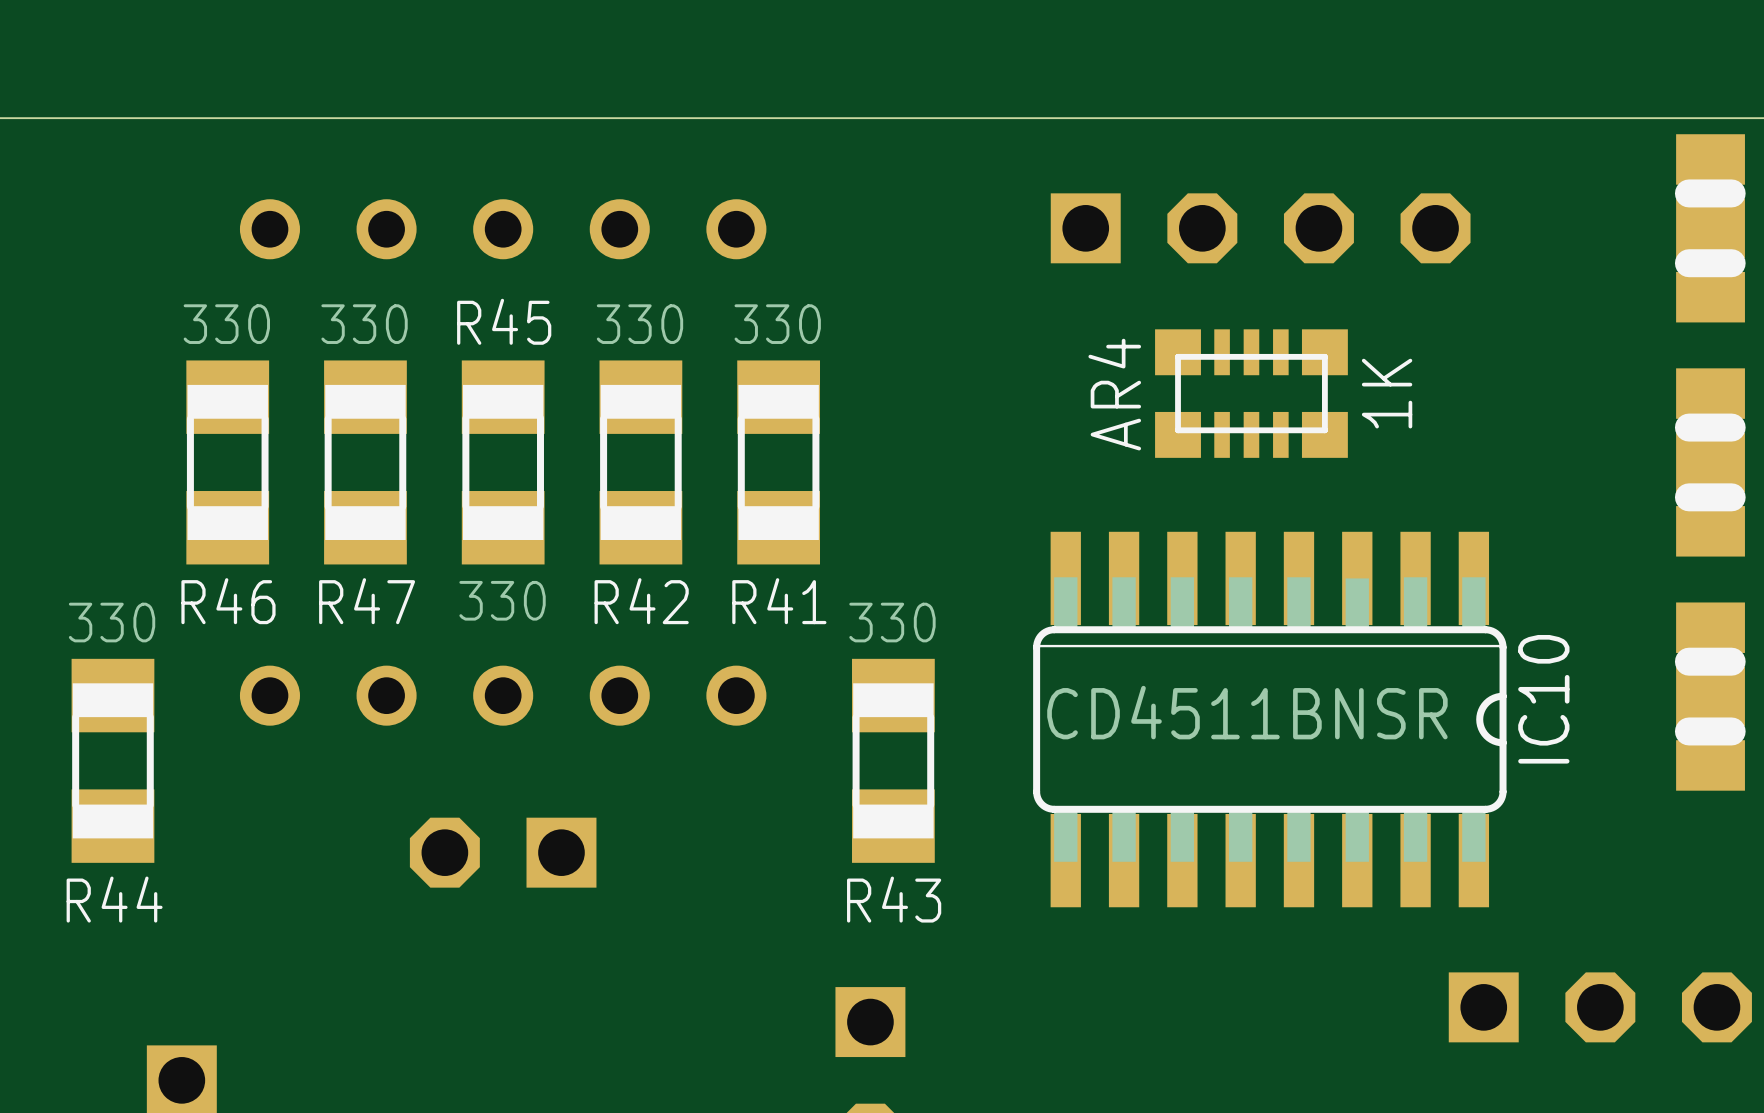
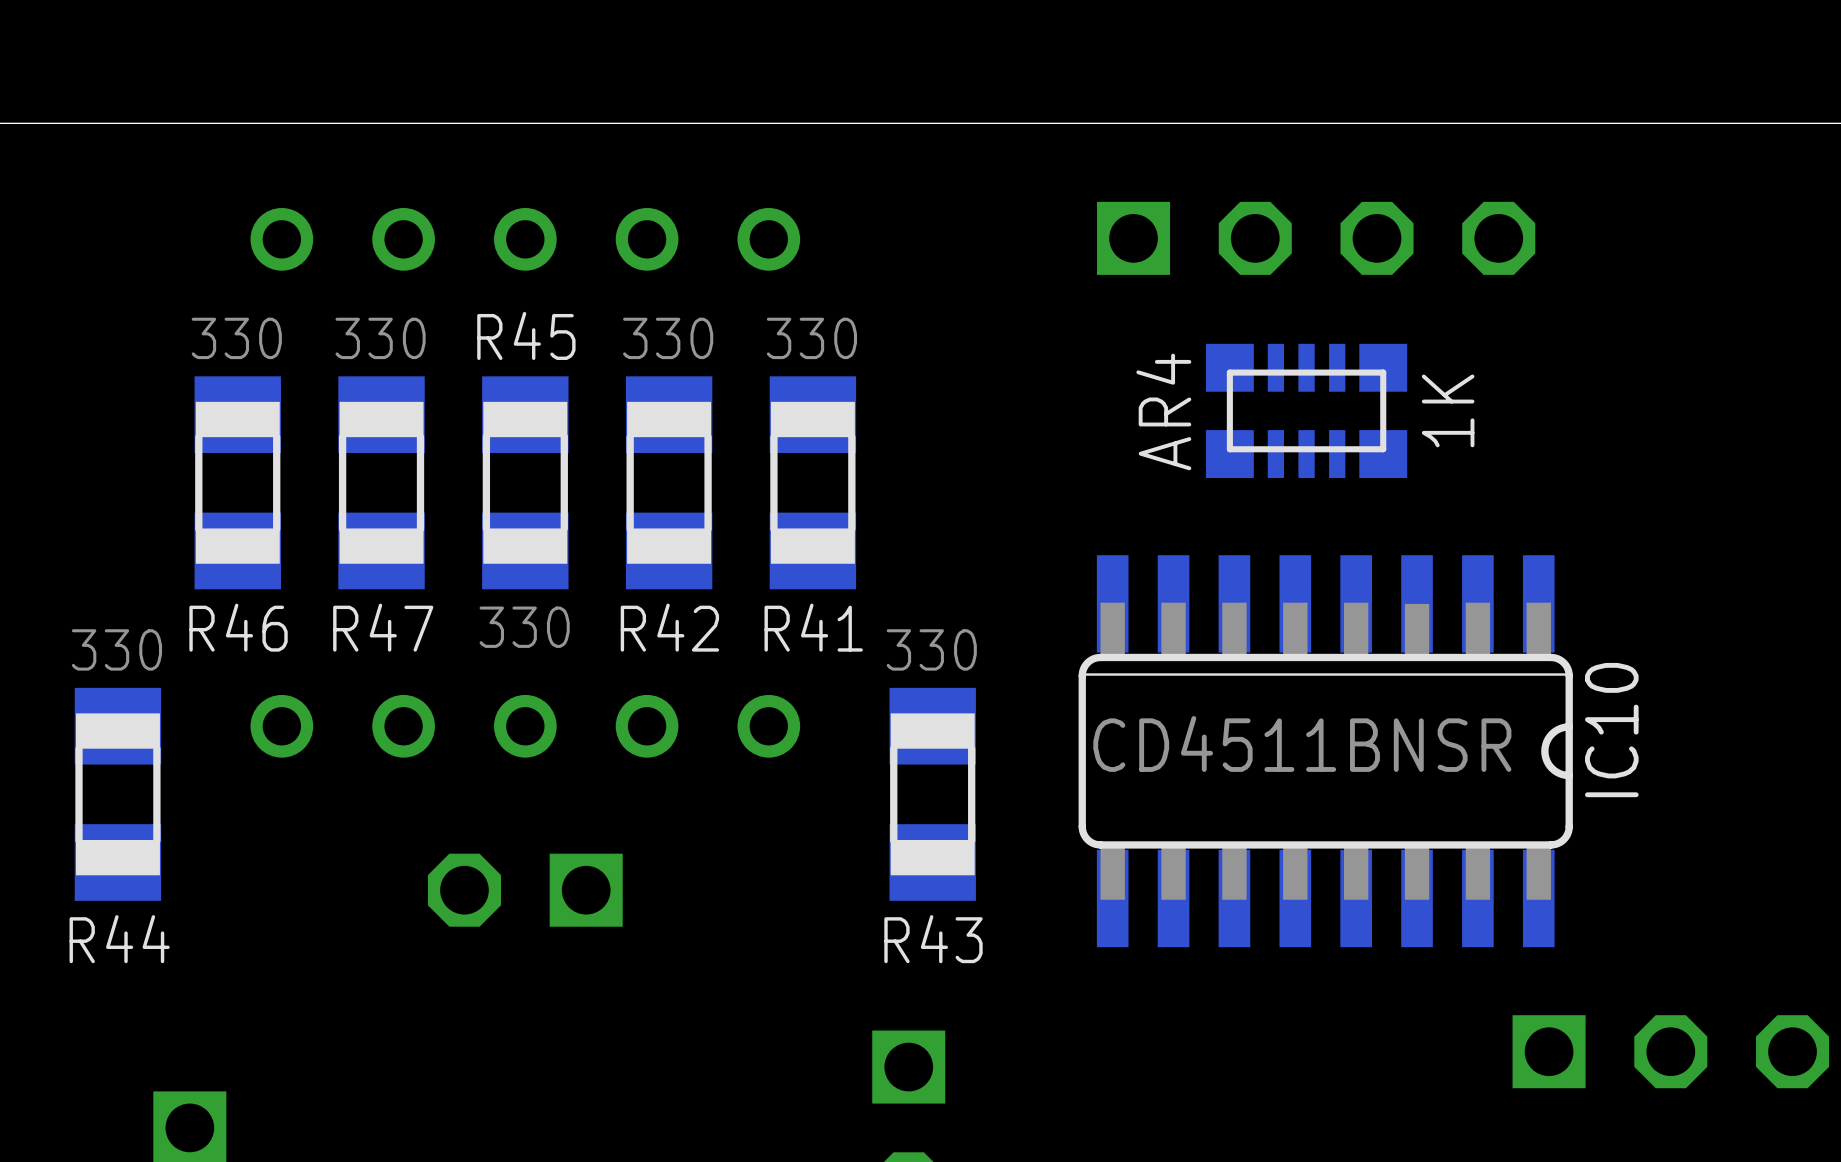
part: (1710, 228) -> none
part: (1710, 462) -> none
part: (1710, 696) -> none

